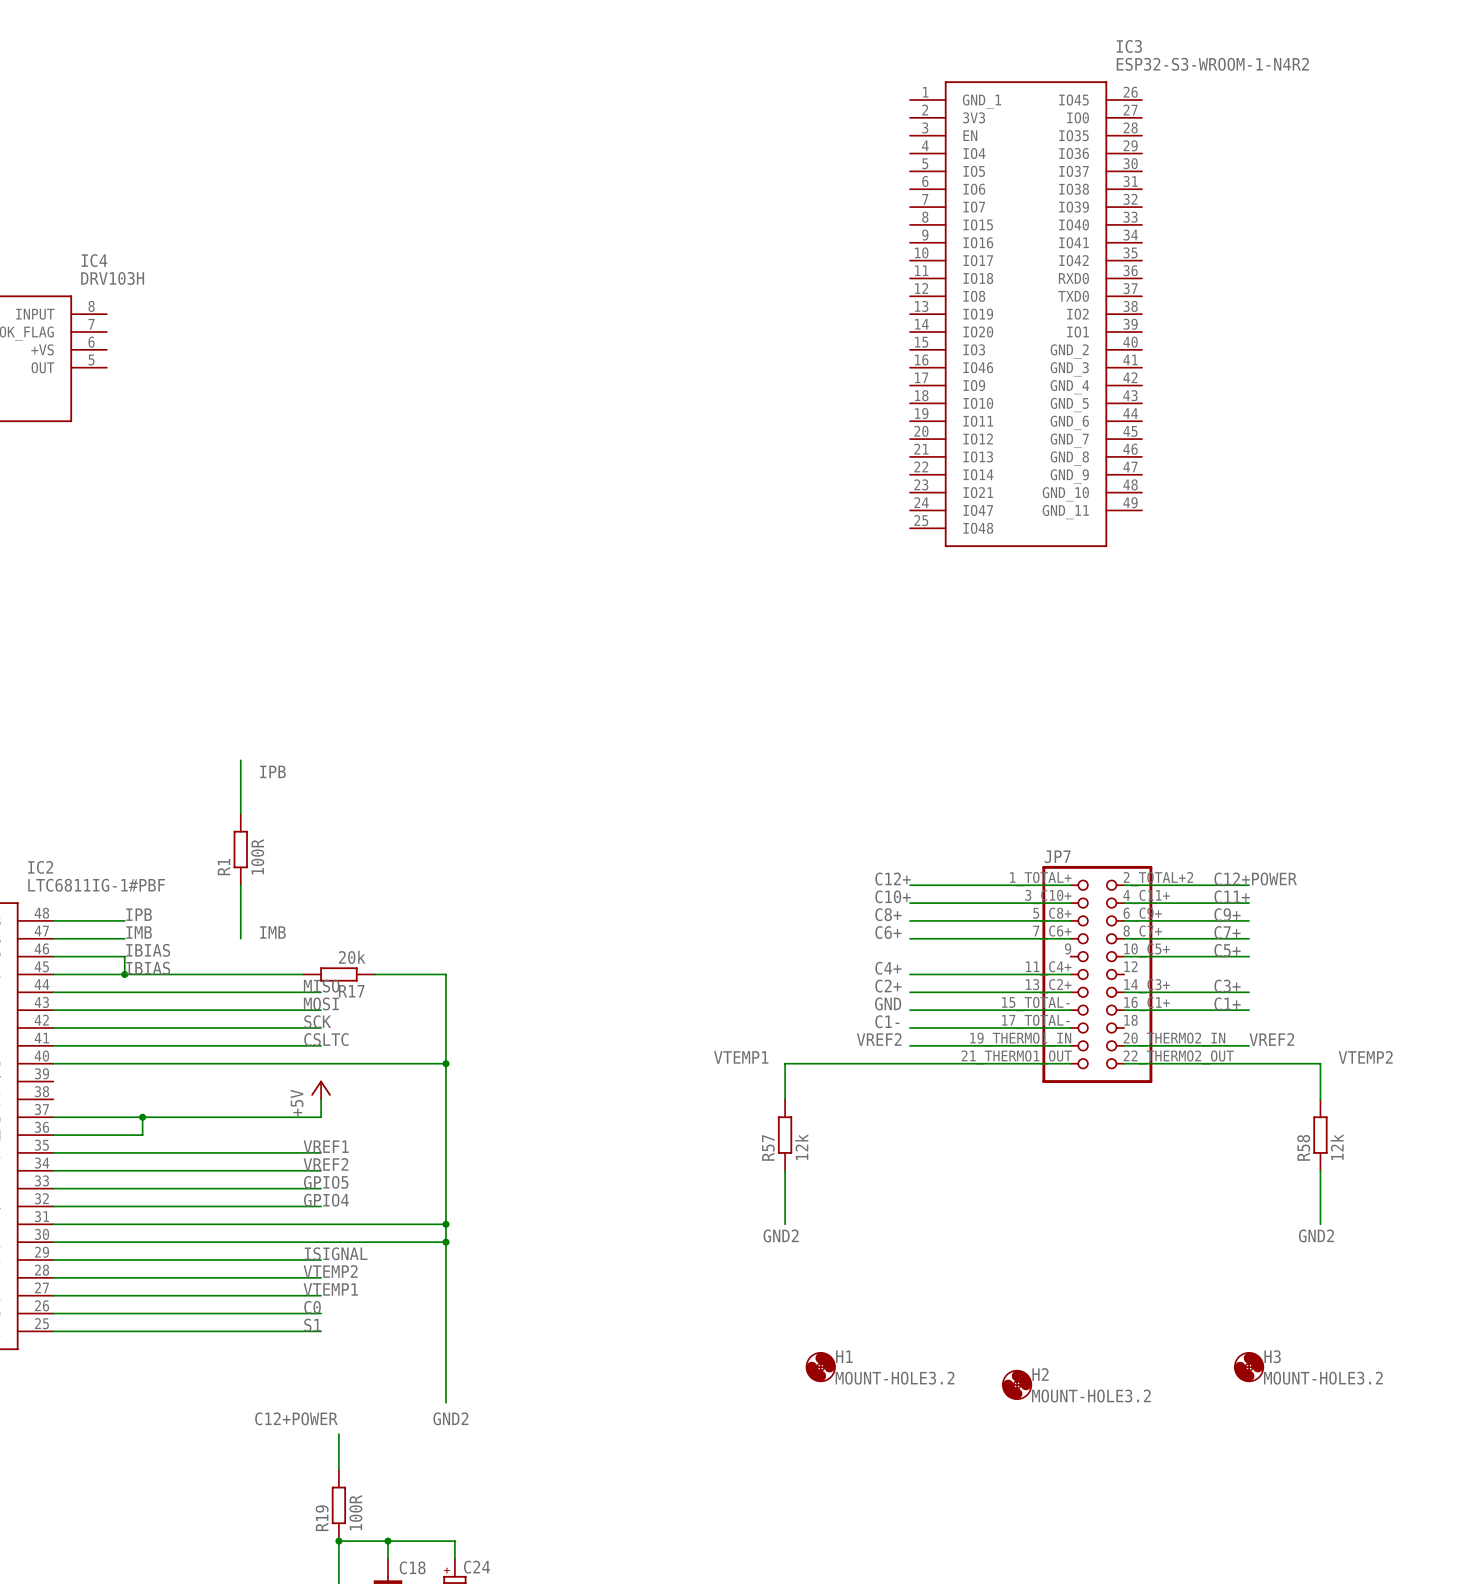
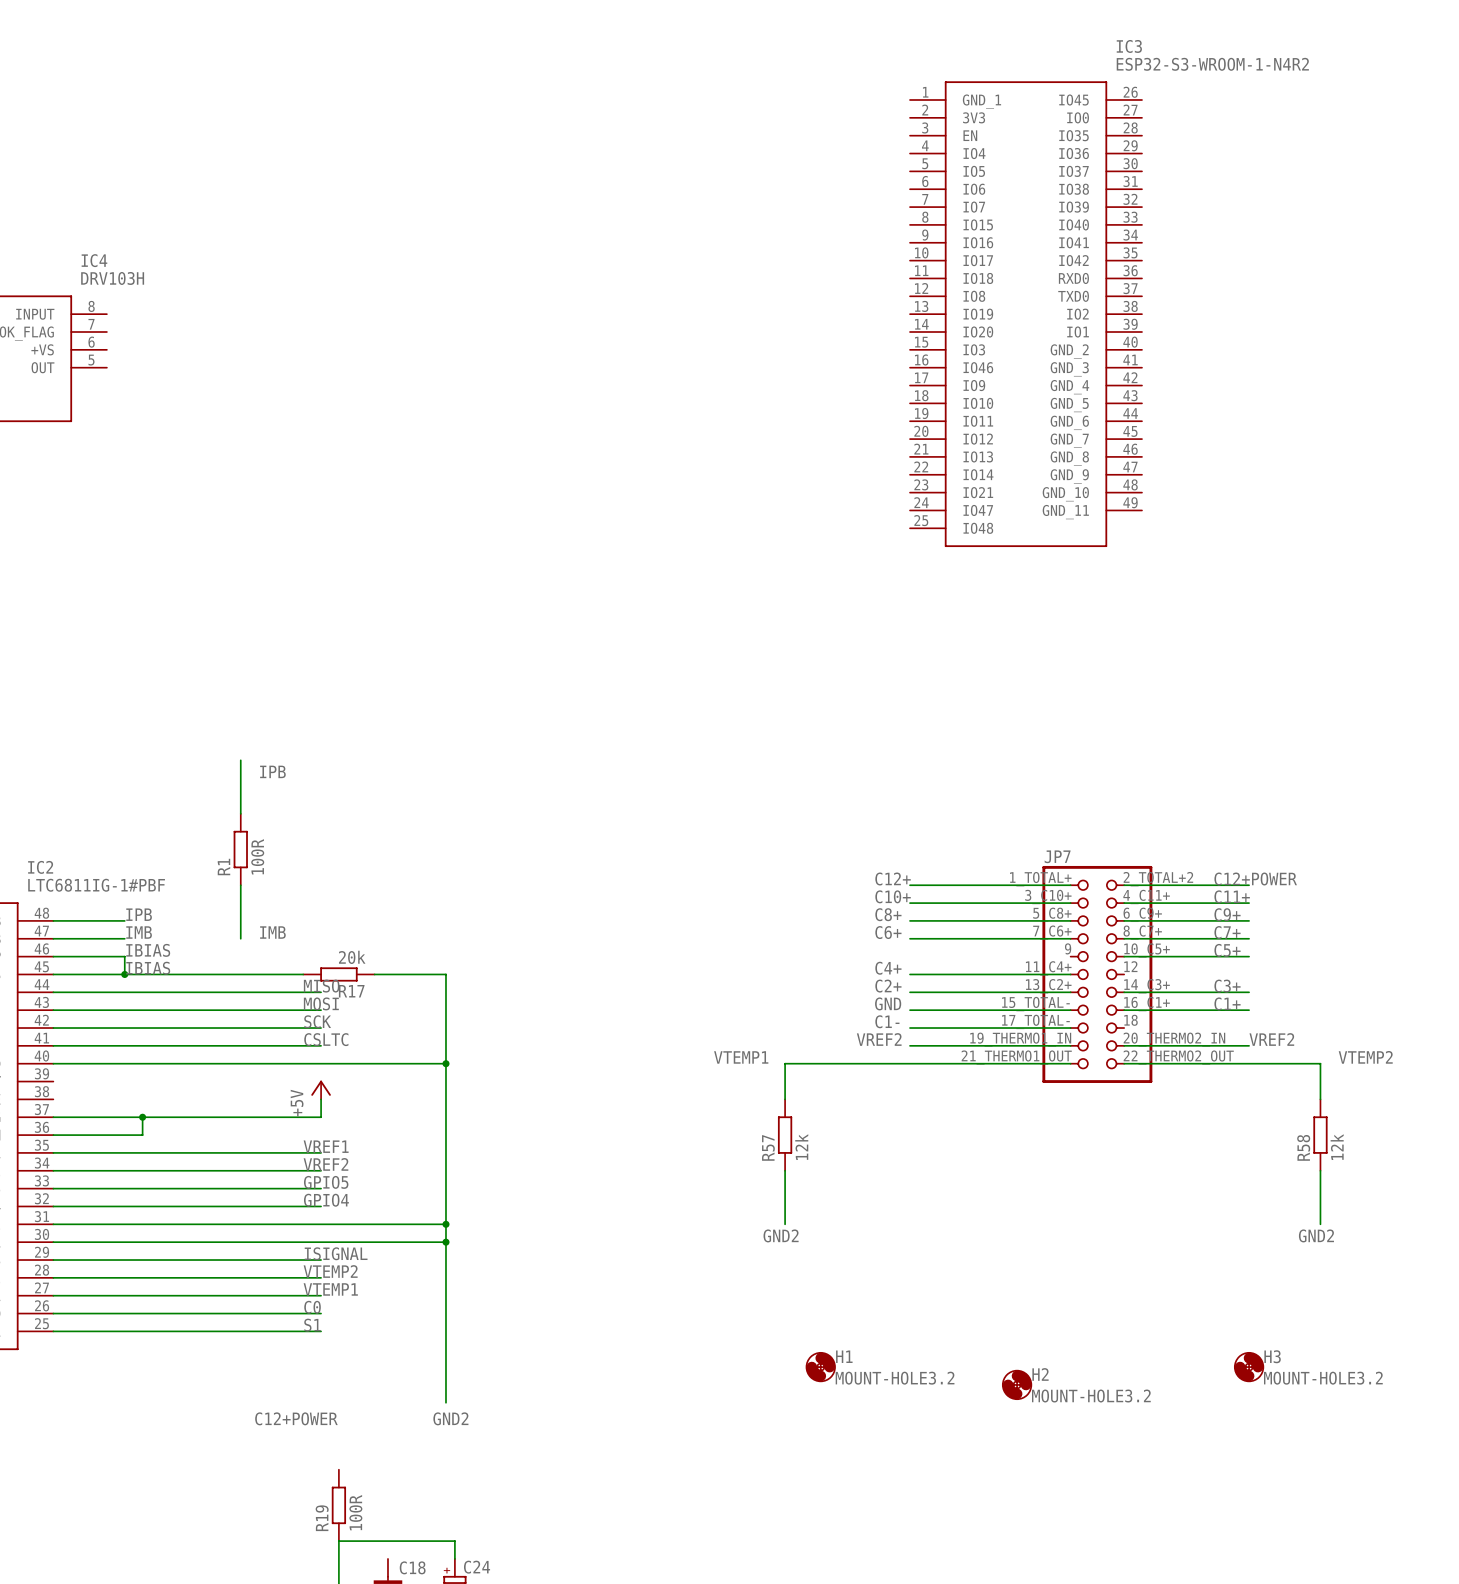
wire: (338, 1434) (338, 1469) -> none
junction: (338, 1541) -> none
wire: (387, 1541) (387, 1558) -> none
junction: (387, 1541) -> none

